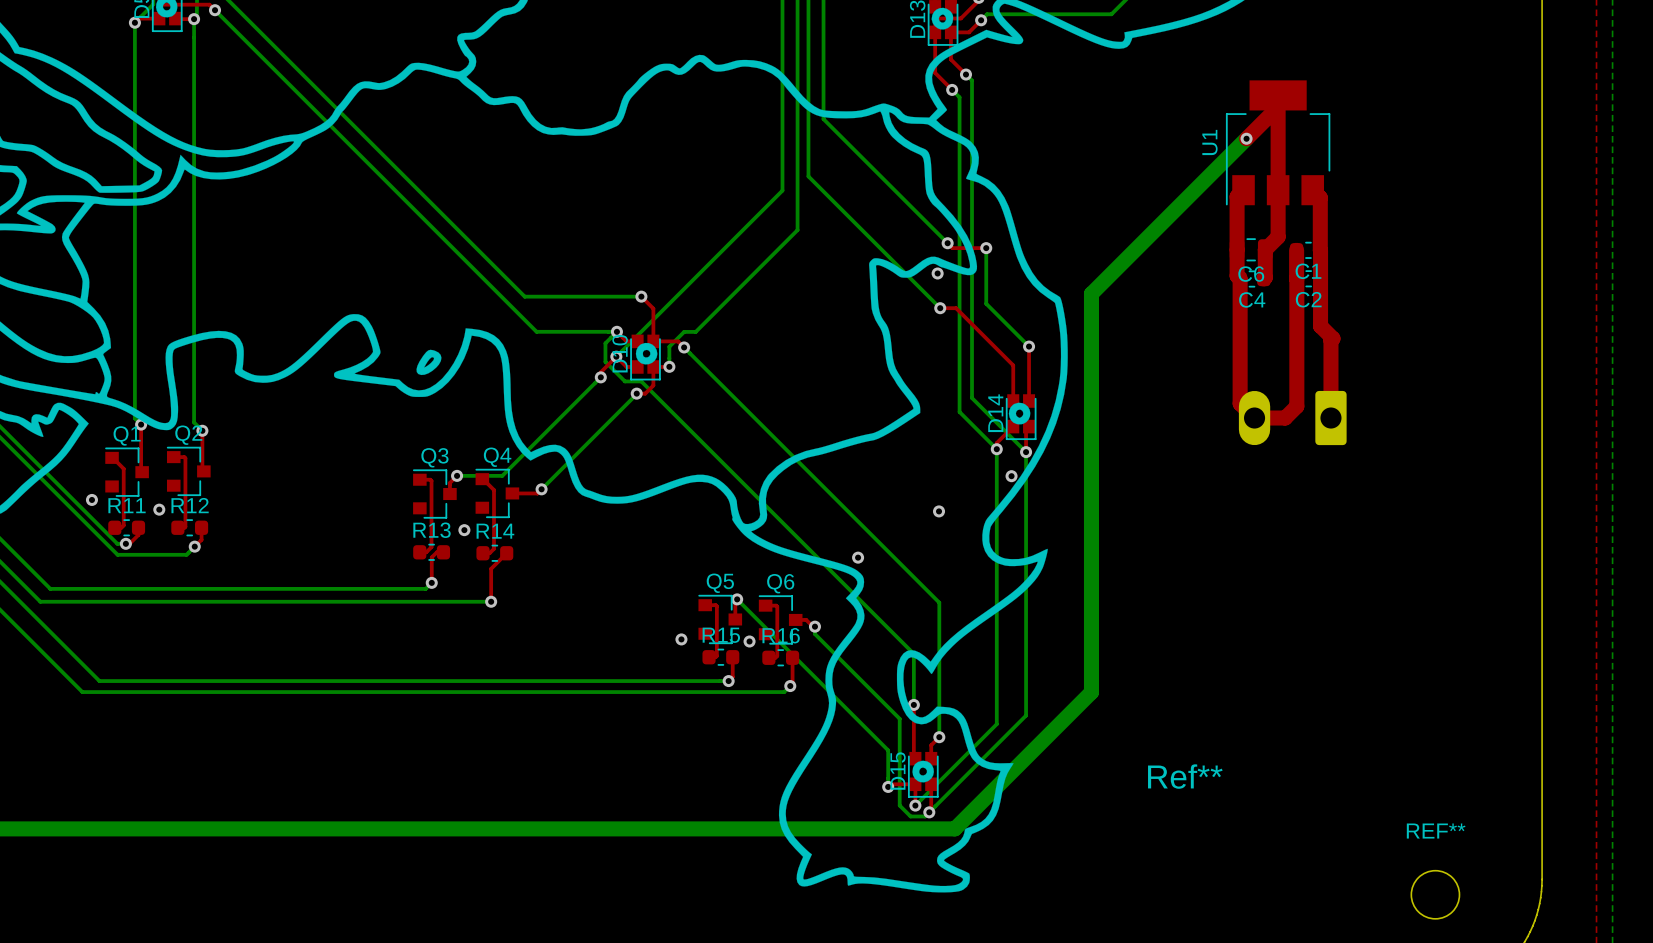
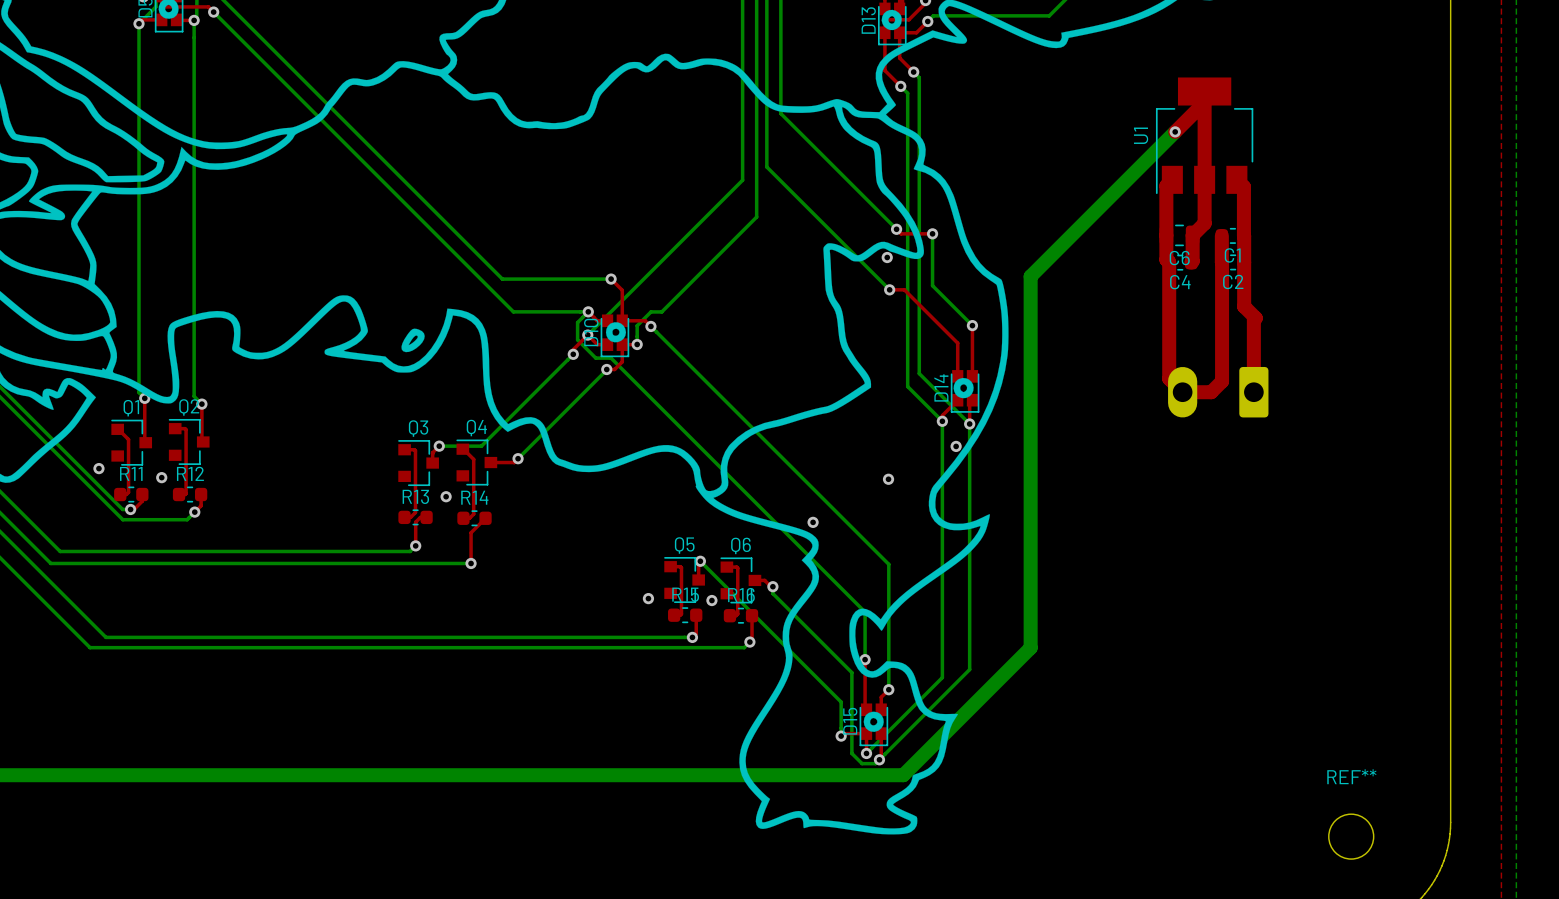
Ref**: (1185, 776) -> none

